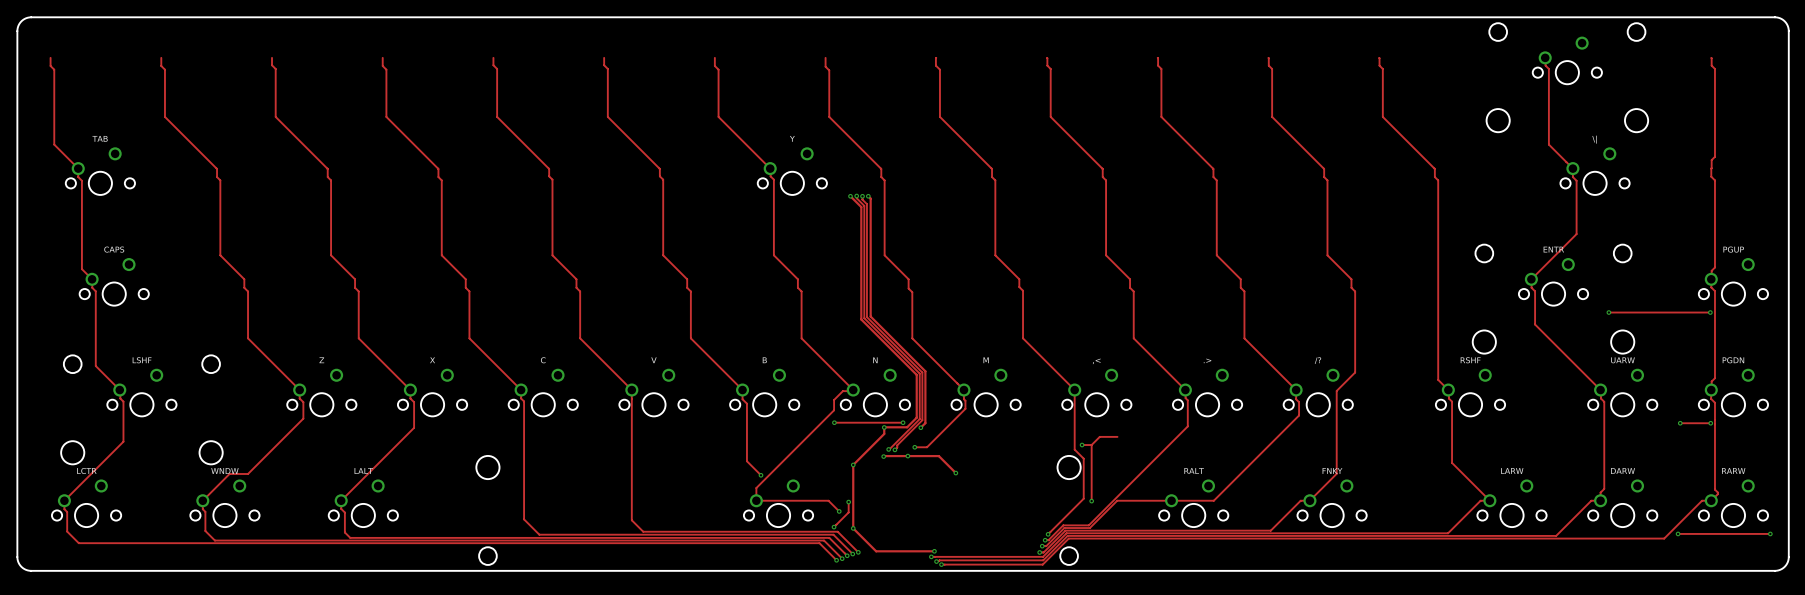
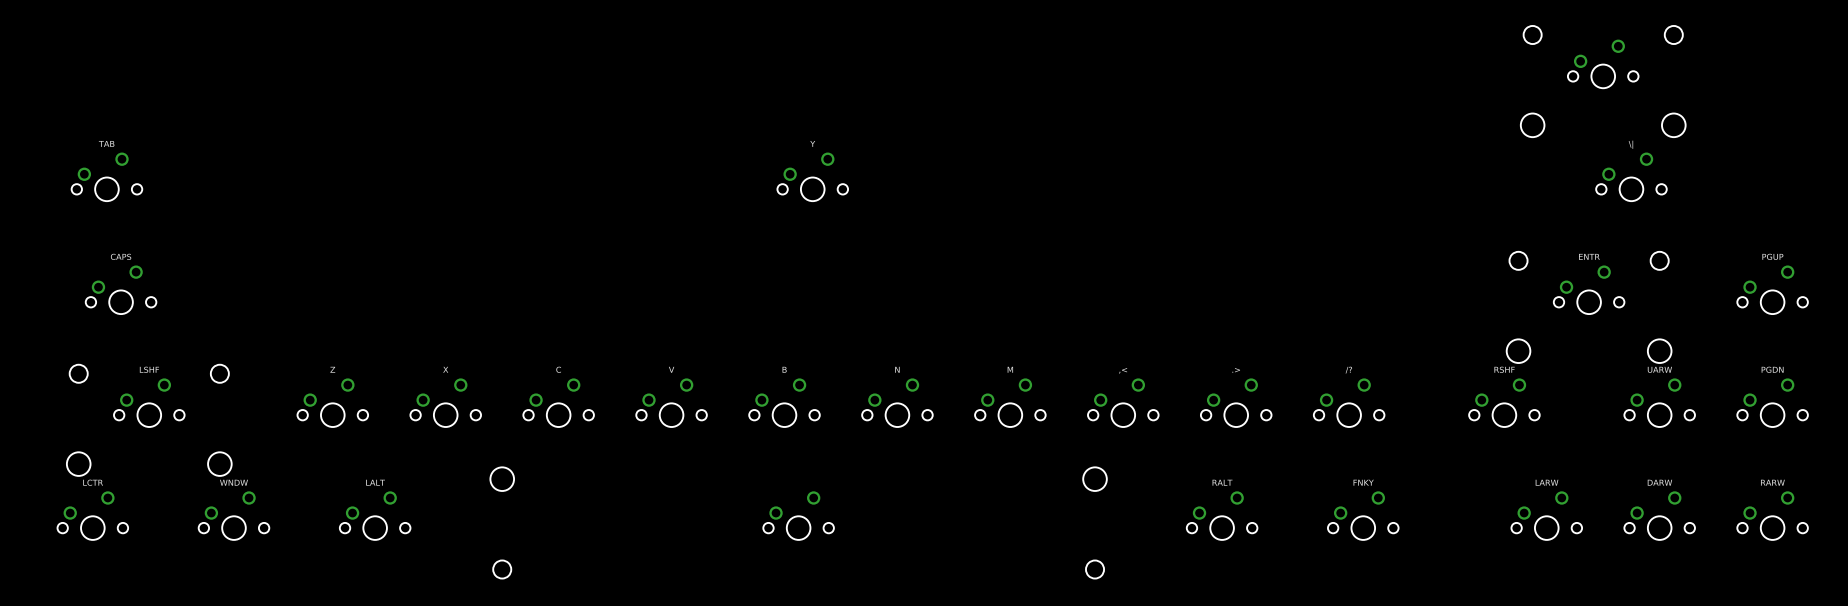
board edge: (31, 17) (1778, 17) (1785, 22) (1788, 31) (1788, 560) (1783, 568) (1774, 570) (27, 570) (20, 565) (17, 557) (17, 31) (21, 21) (31, 17) -> none
track: (50, 57) (50, 66) (54, 69) (54, 144) (78, 168) (78, 177) (81, 180) (81, 269) (92, 279) (92, 287) (95, 291) (95, 366) (120, 390) (120, 398) (123, 401) (123, 441) (64, 500) (64, 509) (67, 512) (67, 531) (78, 543) (819, 543) (836, 560) -> none
track: (161, 57) (161, 66) (164, 69) (164, 116) (217, 168) (217, 177) (220, 180) (220, 255) (244, 279) (244, 287) (248, 291) (248, 338) (299, 390) (299, 398) (303, 402) (303, 418) (248, 473) (229, 473) (202, 500) (202, 509) (205, 511) (205, 531) (214, 540) (824, 540) (842, 558) -> none
track: (272, 57) (272, 65) (275, 68) (275, 116) (327, 168) (327, 177) (331, 180) (331, 255) (355, 279) (355, 287) (358, 291) (358, 338) (410, 390) (410, 398) (414, 402) (414, 427) (341, 500) (341, 508) (344, 512) (344, 532) (350, 537) (829, 537) (847, 555) -> none
track: (382, 57) (382, 66) (386, 69) (386, 116) (438, 168) (438, 177) (441, 180) (441, 255) (465, 279) (465, 287) (469, 291) (469, 338) (521, 390) (521, 398) (524, 401) (524, 519) (539, 534) (833, 534) (852, 554) -> none
track: (493, 57) (493, 65) (497, 68) (497, 116) (549, 168) (549, 176) (552, 179) (552, 255) (576, 279) (576, 287) (580, 291) (580, 338) (631, 390) (631, 520) (643, 531) (837, 531) (858, 552) -> none
track: (604, 57) (604, 65) (607, 68) (607, 116) (659, 168) (659, 176) (663, 179) (663, 255) (687, 279) (687, 287) (690, 291) (690, 338) (742, 390) (742, 399) (746, 403) (746, 461) (760, 475) -> none
track: (714, 57) (714, 66) (718, 69) (718, 116) (770, 168) (770, 176) (773, 179) (773, 255) (797, 279) (797, 287) (801, 291) (801, 338) (853, 390) (842, 391) (834, 399) (834, 410) (756, 488) (756, 500) (828, 500) (839, 511) -> none
track: (825, 57) (825, 66) (829, 70) (829, 116) (881, 168) (881, 177) (884, 180) (884, 255) (908, 279) (908, 288) (912, 292) (912, 338) (963, 390) (965, 408) (927, 447) (914, 447) -> none
track: (936, 57) (935, 65) (939, 69) (939, 116) (992, 168) (992, 177) (995, 180) (995, 255) (1019, 279) (1019, 287) (1023, 290) (1023, 338) (1074, 390) (1074, 449) (1083, 458) (1083, 498) (1048, 534) -> none
track: (1047, 57) (1047, 65) (1050, 68) (1050, 116) (1102, 168) (1102, 177) (1106, 180) (1106, 255) (1130, 279) (1130, 287) (1133, 291) (1133, 338) (1185, 390) (1185, 398) (1187, 400) (1187, 426) (1088, 525) (1063, 525) (1048, 540) (1045, 540) -> none
track: (1157, 57) (1158, 65) (1161, 68) (1161, 116) (1213, 168) (1213, 177) (1216, 180) (1216, 255) (1240, 279) (1240, 287) (1244, 291) (1244, 338) (1296, 390) (1296, 399) (1299, 402) (1299, 415) (1213, 500) (1117, 500) (1089, 528) (1064, 528) (1046, 546) (1042, 546) -> none
track: (1268, 57) (1268, 65) (1272, 68) (1272, 116) (1324, 168) (1324, 177) (1327, 180) (1327, 255) (1351, 279) (1351, 287) (1355, 291) (1355, 372) (1336, 390) (1336, 473) -> none
track: (1379, 57) (1379, 65) (1382, 68) (1382, 116) (1434, 168) (1434, 177) (1438, 180) (1438, 379) (1448, 390) (1448, 398) (1452, 401) (1452, 462) (1489, 500) (1480, 500) (1448, 533) (1066, 533) (1043, 556) (931, 556) -> none
track: (1545, 57) (1545, 65) (1548, 68) (1548, 144) (1572, 168) (1572, 177) (1576, 180) (1576, 234) (1531, 279) (1531, 287) (1535, 291) (1535, 324) (1600, 390) (1600, 398) (1604, 401) (1604, 488) (1600, 492) (1600, 500) (1591, 500) (1556, 535) (1067, 535) (1043, 560) (936, 561) -> none
track: (1711, 57) (1711, 65) (1714, 68) (1714, 156) (1711, 160) (1711, 168) (1711, 176) (1714, 180) (1714, 267) (1711, 270) (1711, 279) (1711, 287) (1714, 291) (1714, 378) (1711, 381) (1711, 398) (1714, 402) (1714, 489) (1717, 494) (1711, 500) (1702, 500) (1664, 538) (1068, 538) (1042, 564) (941, 564) -> none
track: (850, 196) (861, 207) (861, 319) (916, 374) (916, 417) (907, 427) (884, 427) (884, 433) (853, 464) (853, 528) (876, 551) (934, 551) -> none
via: (850, 196) -> none
track: (856, 196) (864, 205) (864, 318) (919, 373) (919, 419) (889, 449) -> none
via: (856, 196) -> none
track: (862, 196) (862, 199) (866, 204) (866, 317) (922, 372) (922, 420) (894, 449) -> none
via: (862, 196) -> none
track: (868, 196) (870, 198) (870, 316) (925, 371) (925, 423) (920, 427) -> none
via: (868, 196) -> none
track: (1608, 312) (1710, 312) -> none
via: (1608, 312) -> none
via: (1710, 312) -> none
track: (834, 422) (903, 422) -> none
via: (834, 422) -> none
via: (903, 422) -> none
track: (1680, 423) (1710, 423) -> none
via: (1680, 423) -> none
via: (1710, 423) -> none
via: (884, 427) -> none
via: (920, 427) -> none
track: (1117, 436) (1099, 436) (1091, 445) -> none
track: (1082, 445) (1091, 445) -> none
via: (1082, 445) -> none
track: (1091, 445) (1091, 501) -> none
via: (914, 447) -> none
via: (888, 449) -> none
via: (894, 449) -> none
track: (883, 456) (938, 456) (955, 473) -> none
via: (883, 456) -> none
via: (907, 456) -> none
via: (853, 464) -> none
via: (955, 473) -> none
track: (1336, 473) (1309, 500) -> none
via: (760, 475) -> none
track: (1309, 500) (1300, 500) (1270, 530) (1065, 530) (1043, 552) (1039, 552) -> none
via: (1091, 501) -> none
track: (848, 502) (848, 512) (834, 527) -> none
via: (848, 502) -> none
via: (839, 511) -> none
via: (834, 527) -> none
via: (853, 528) -> none
track: (1678, 533) (1770, 533) -> none
via: (1678, 533) -> none
via: (1770, 533) -> none
via: (1048, 534) -> none
via: (1045, 540) -> none
via: (1042, 546) -> none
via: (934, 551) -> none
via: (858, 552) -> none
via: (1039, 552) -> none
via: (852, 554) -> none
via: (847, 555) -> none
via: (931, 556) -> none
via: (842, 558) -> none
via: (836, 560) -> none
via: (936, 561) -> none
via: (941, 564) -> none

